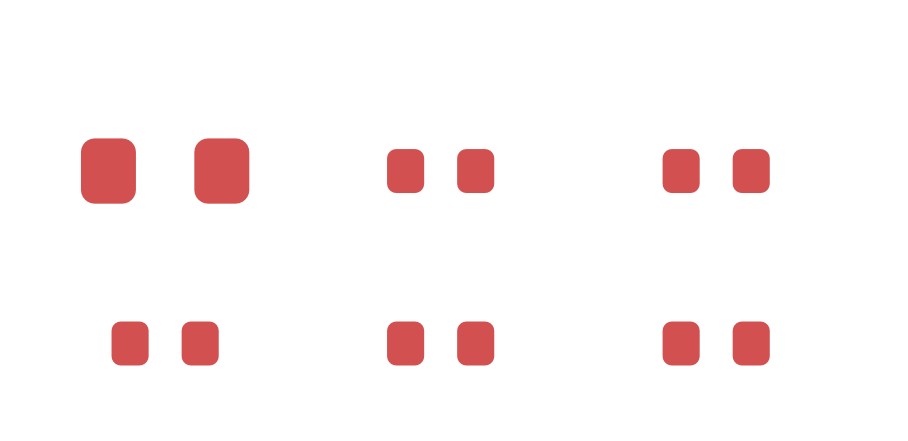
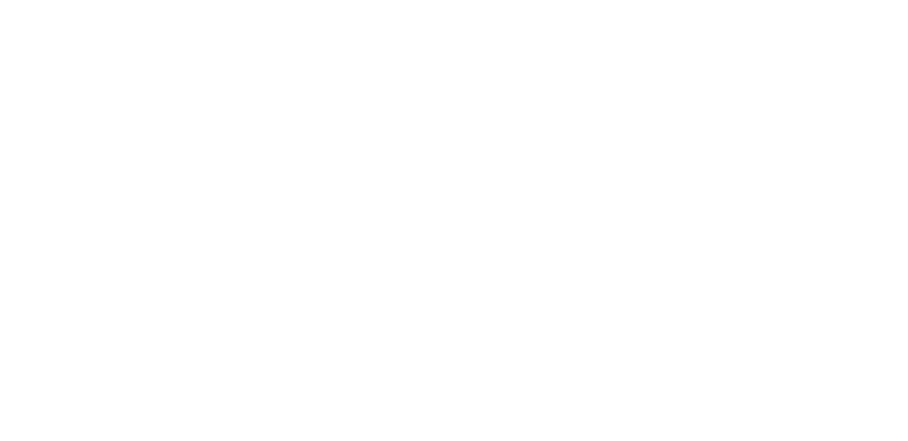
part: (165, 171) -> none
part: (440, 171) -> none
part: (716, 171) -> none
part: (165, 343) -> none
part: (440, 343) -> none
part: (716, 343) -> none

